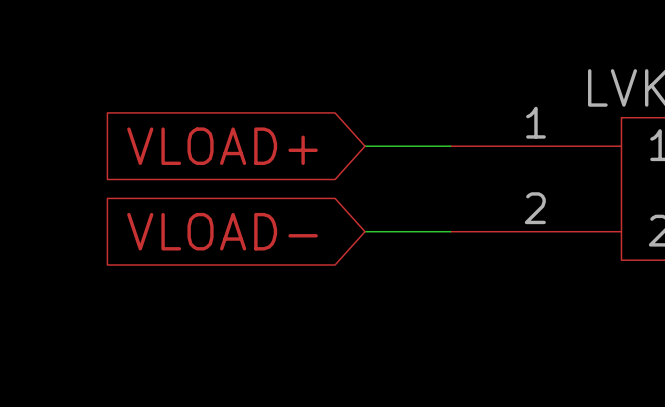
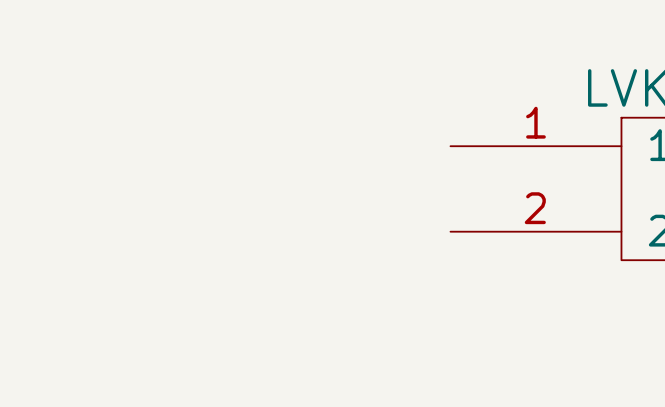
global label: VLOAD+ (222, 146) -> none
wire: (365, 146) (450, 146) -> none
global label: VLOAD- (222, 231) -> none
wire: (365, 231) (450, 231) -> none

